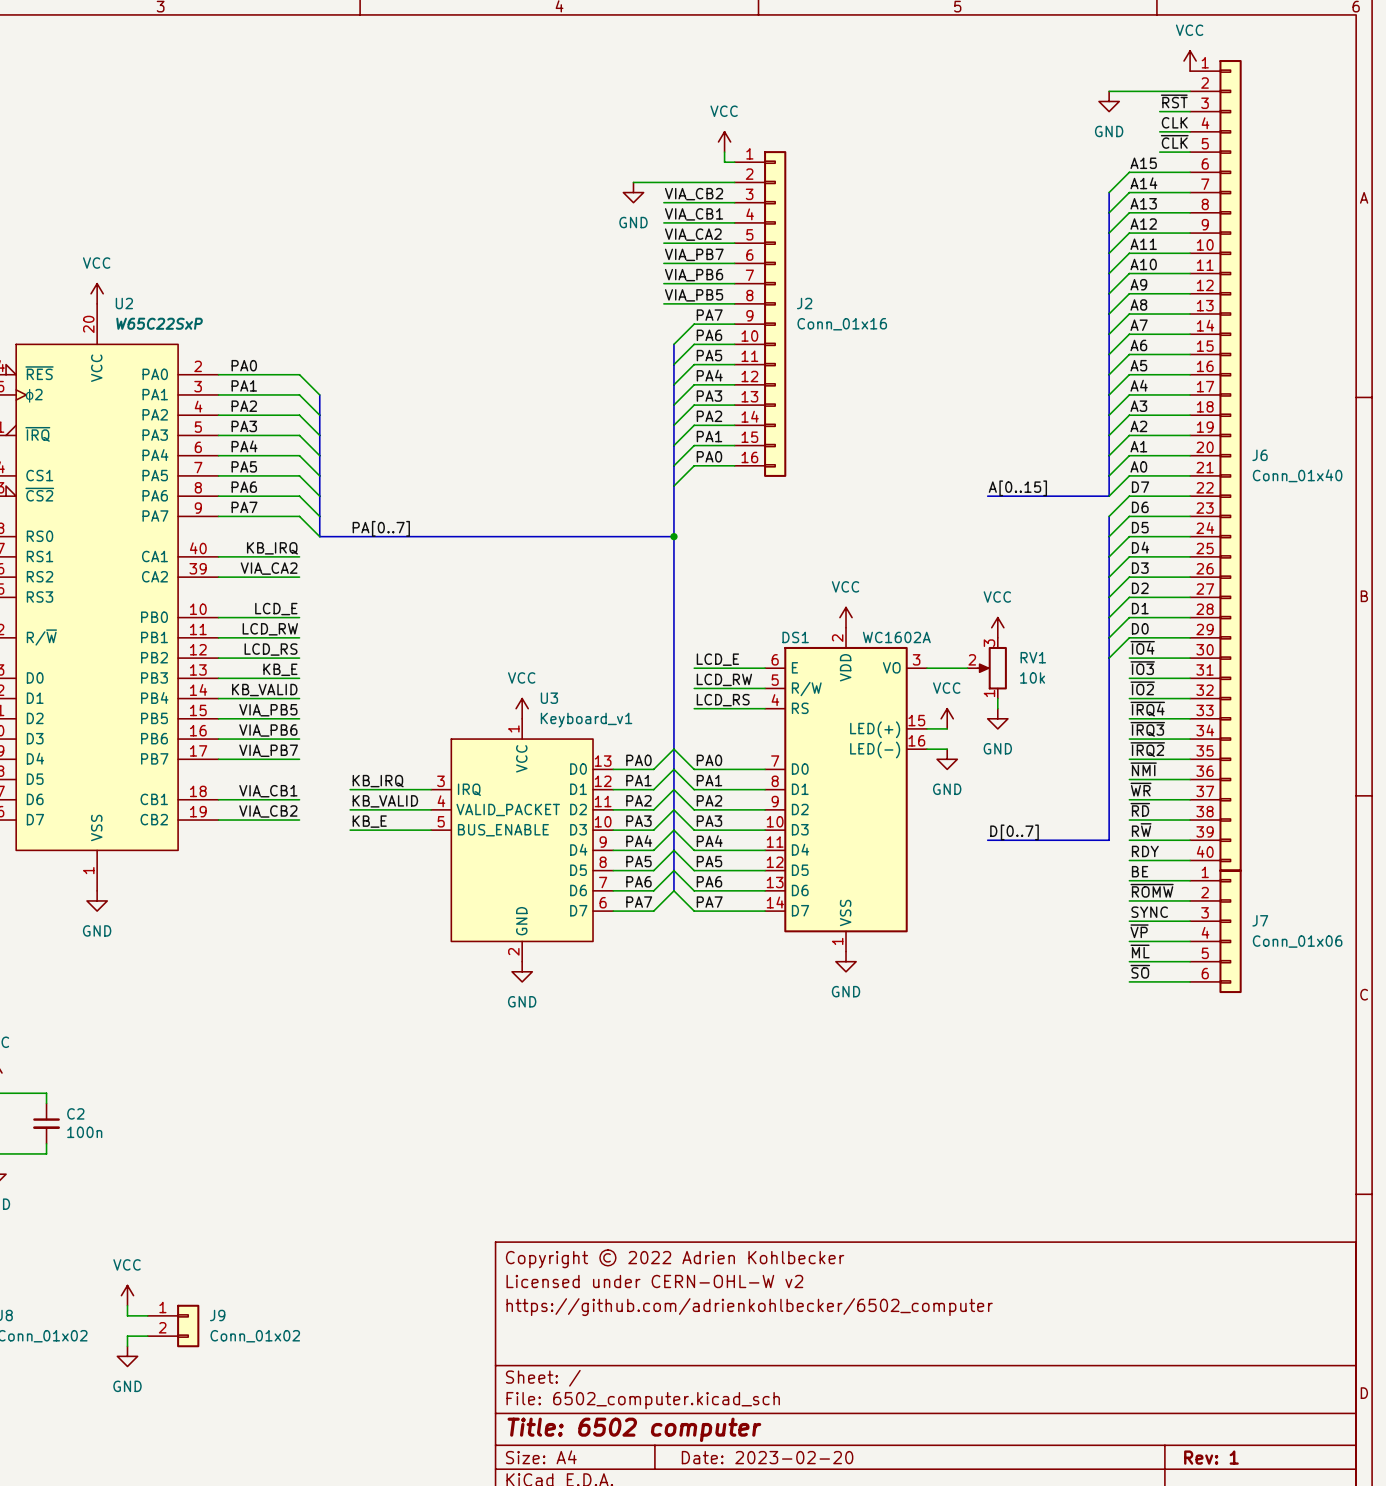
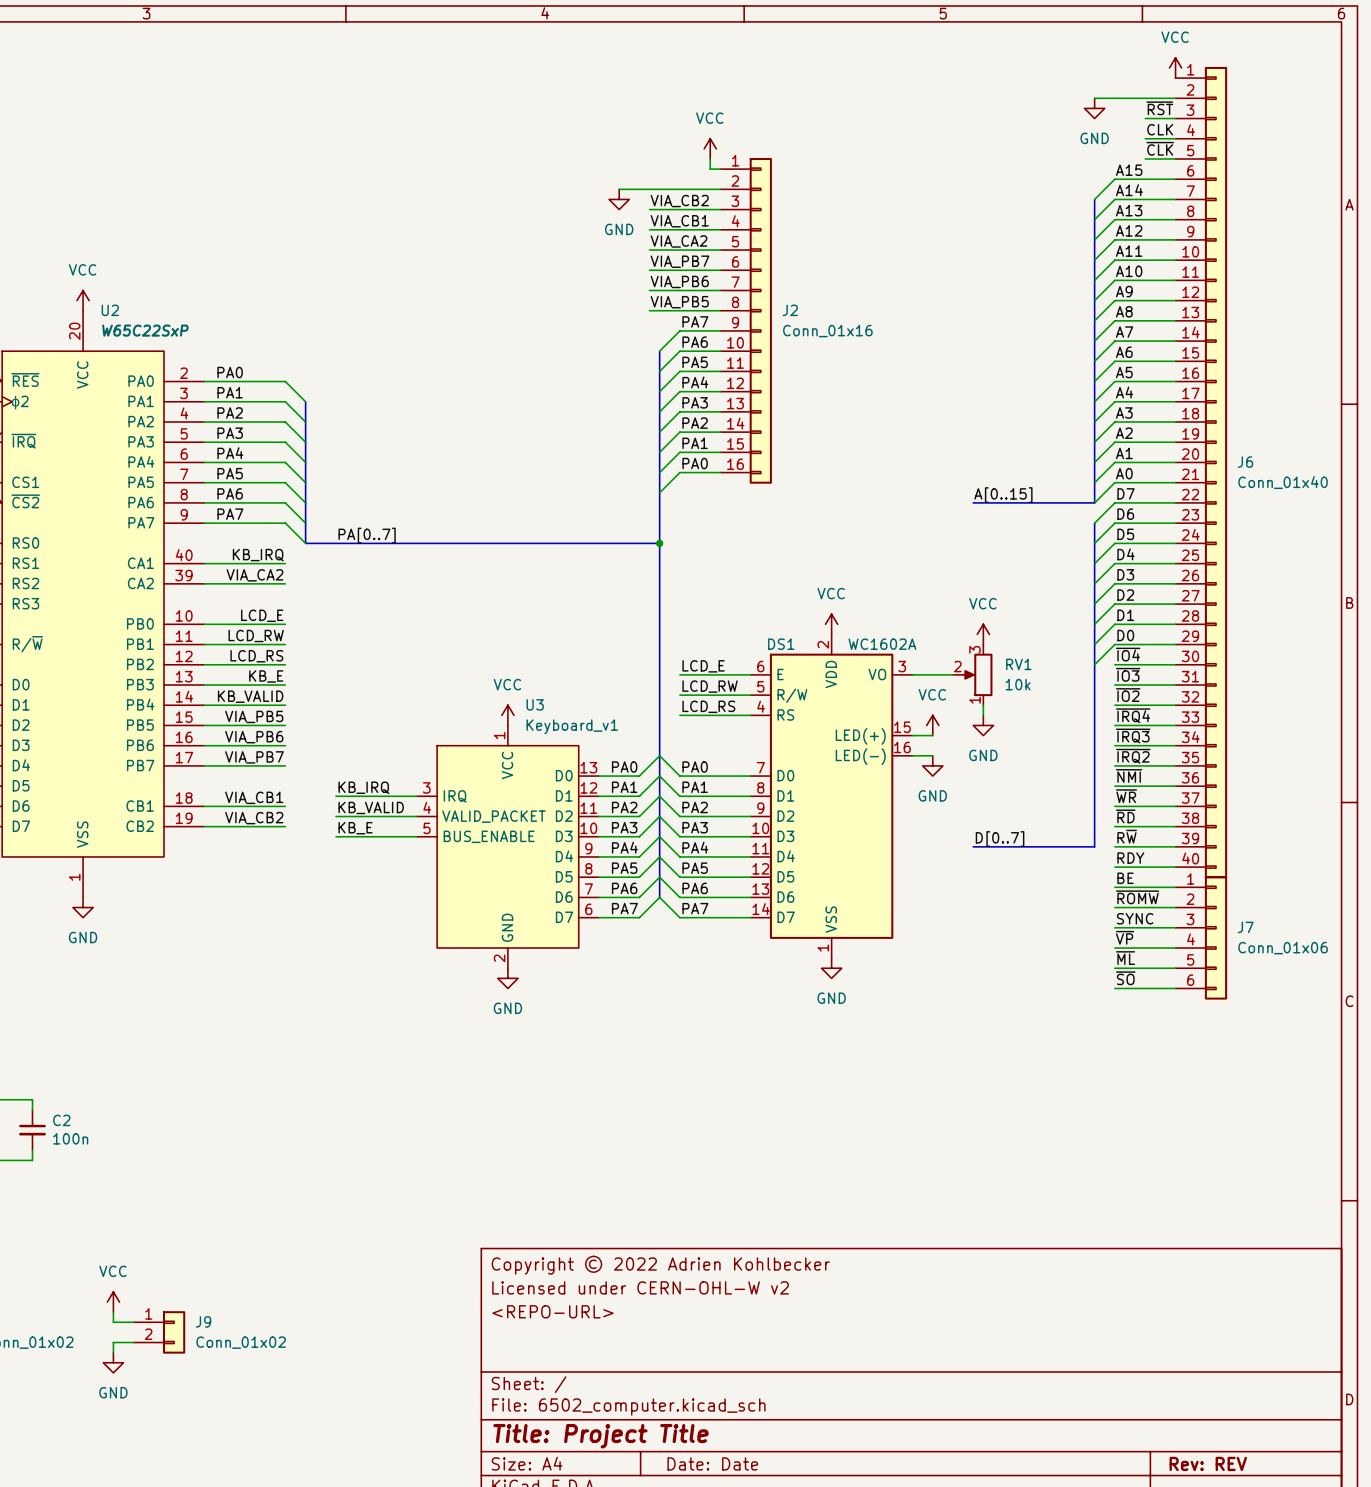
title block: https://github.com/adrienkohlbecker/6502_computer (749, 1307) -> <REPO-URL> (552, 1311)
title block: Title: 6502 computer (634, 1429) -> Title: Project Title (600, 1436)
title block: Date: 2023-02-20 (767, 1457) -> Date: Date (712, 1463)
title block: Rev: 1 (1211, 1457) -> Rev: REV (1208, 1463)

